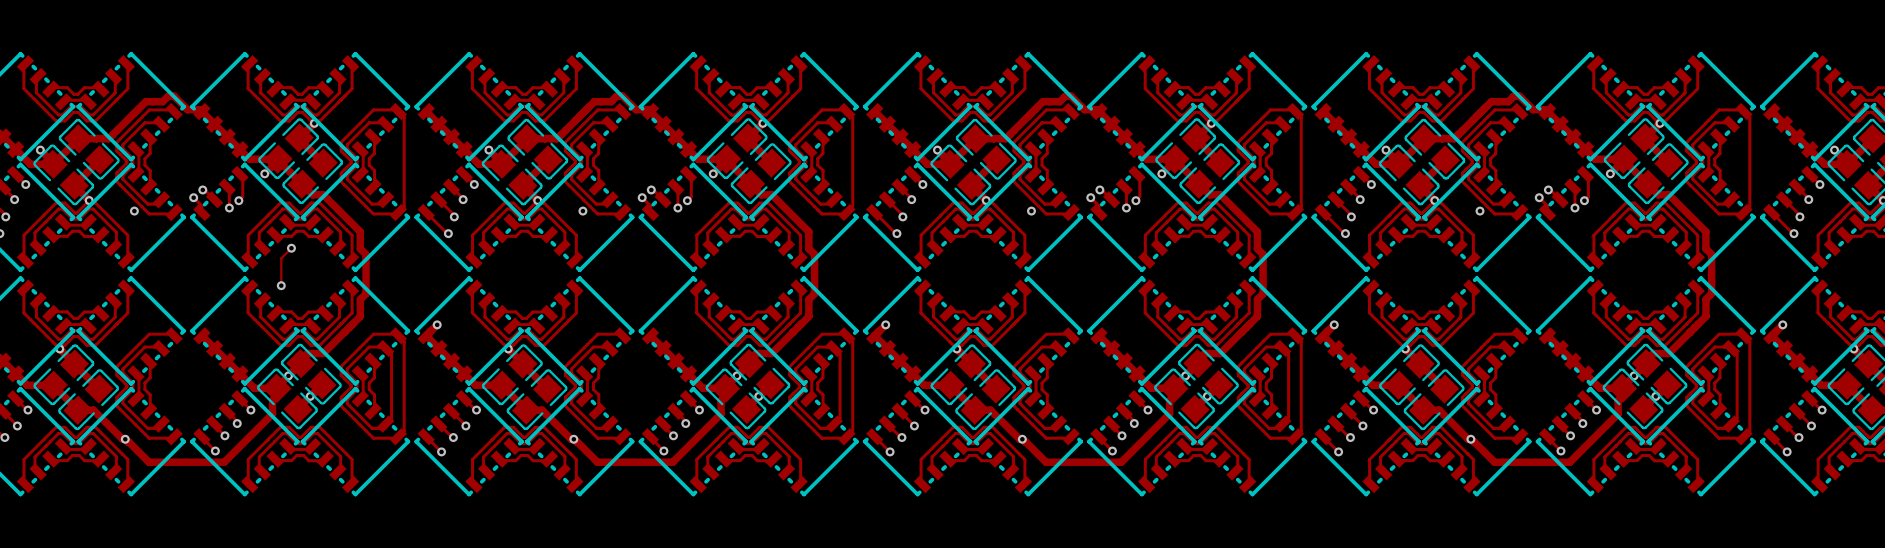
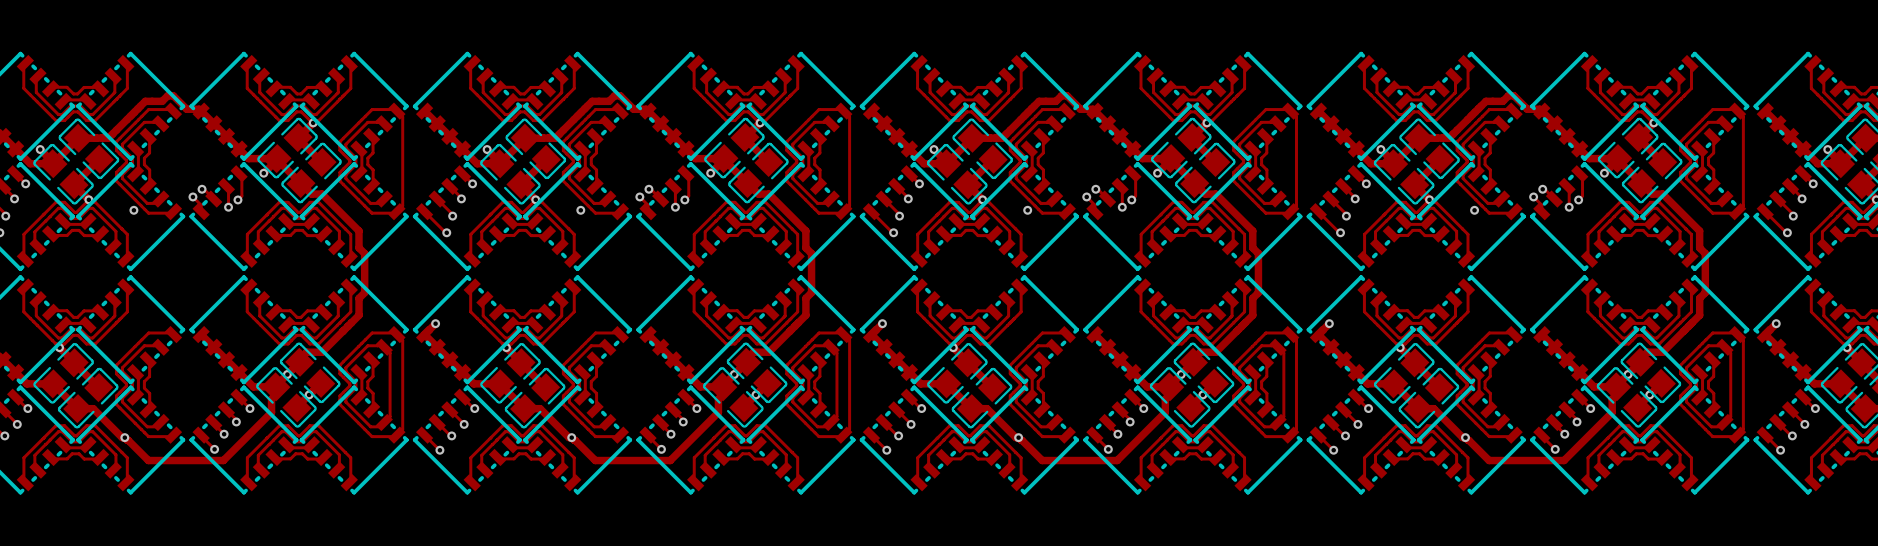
track: (291, 248) (281, 258) (281, 285) -> none
via: (291, 248) -> none
via: (281, 285) -> none

